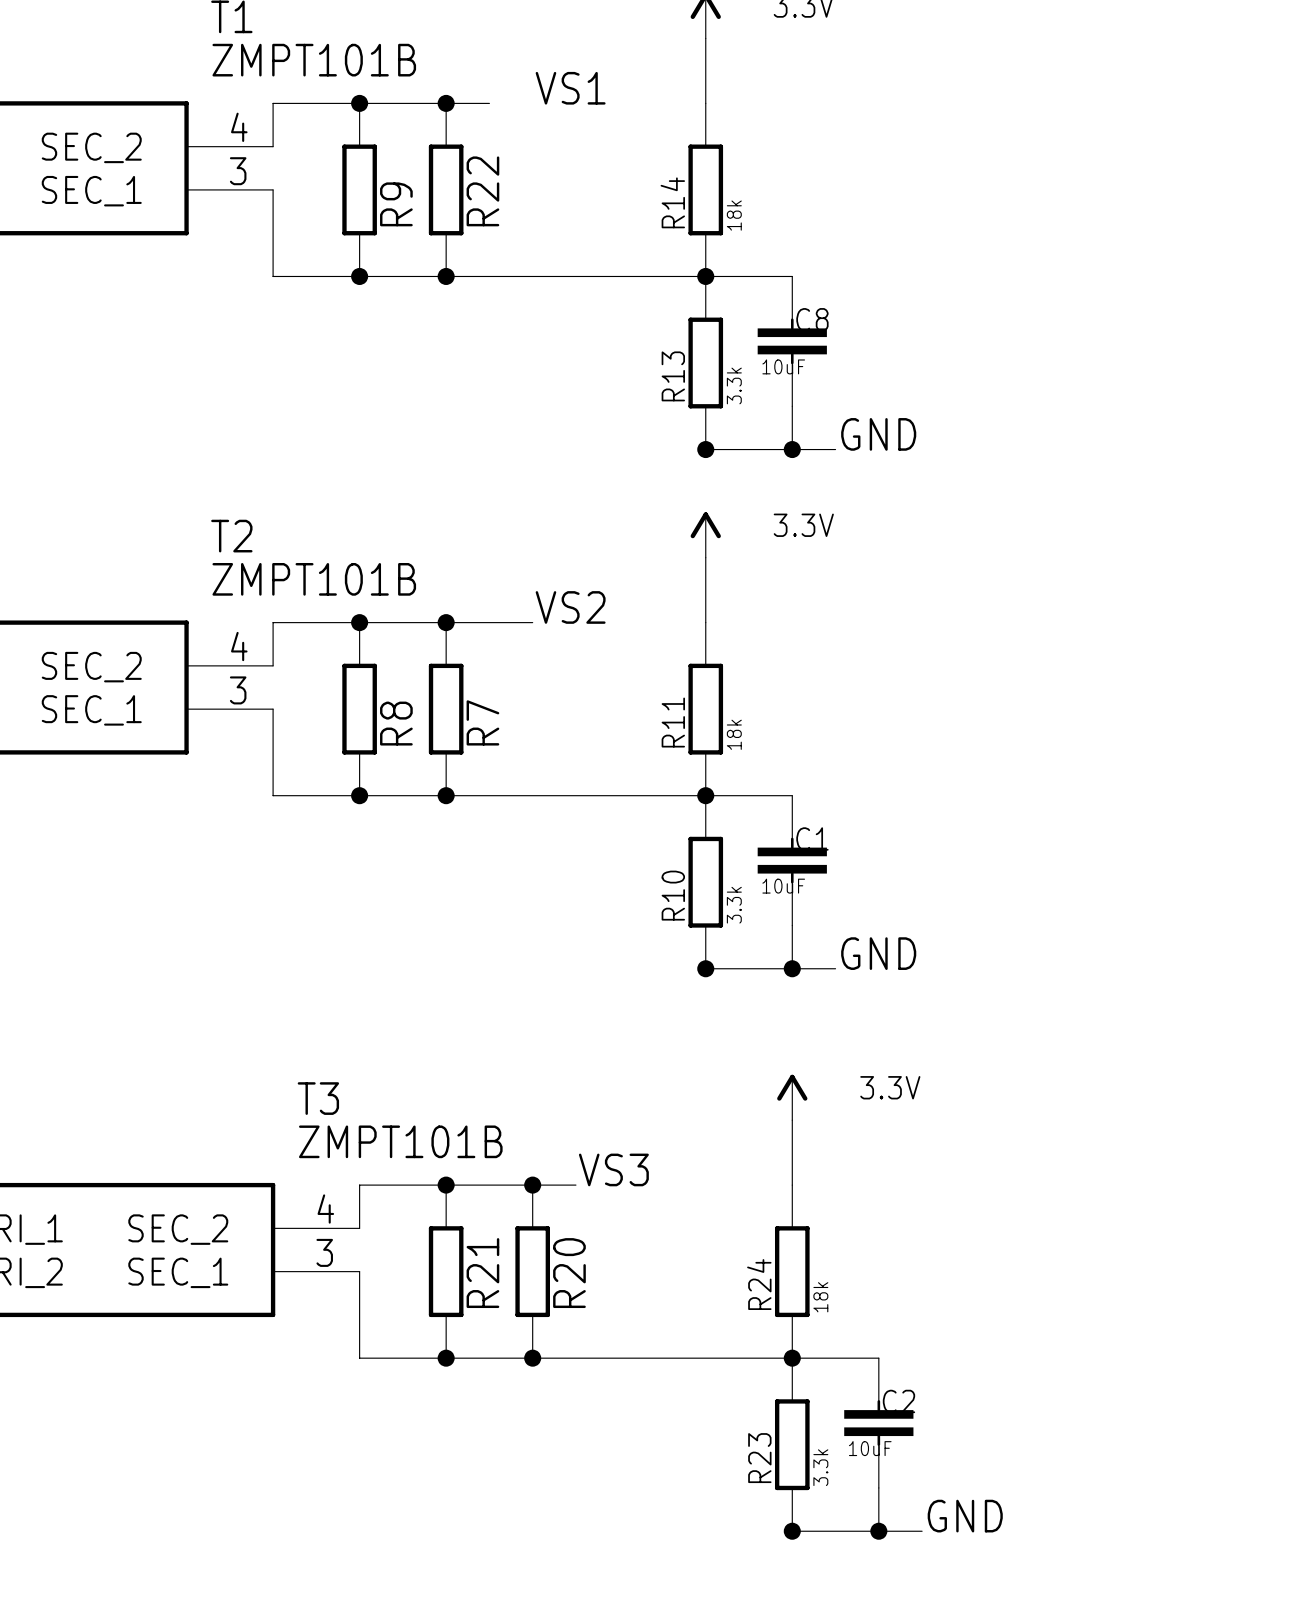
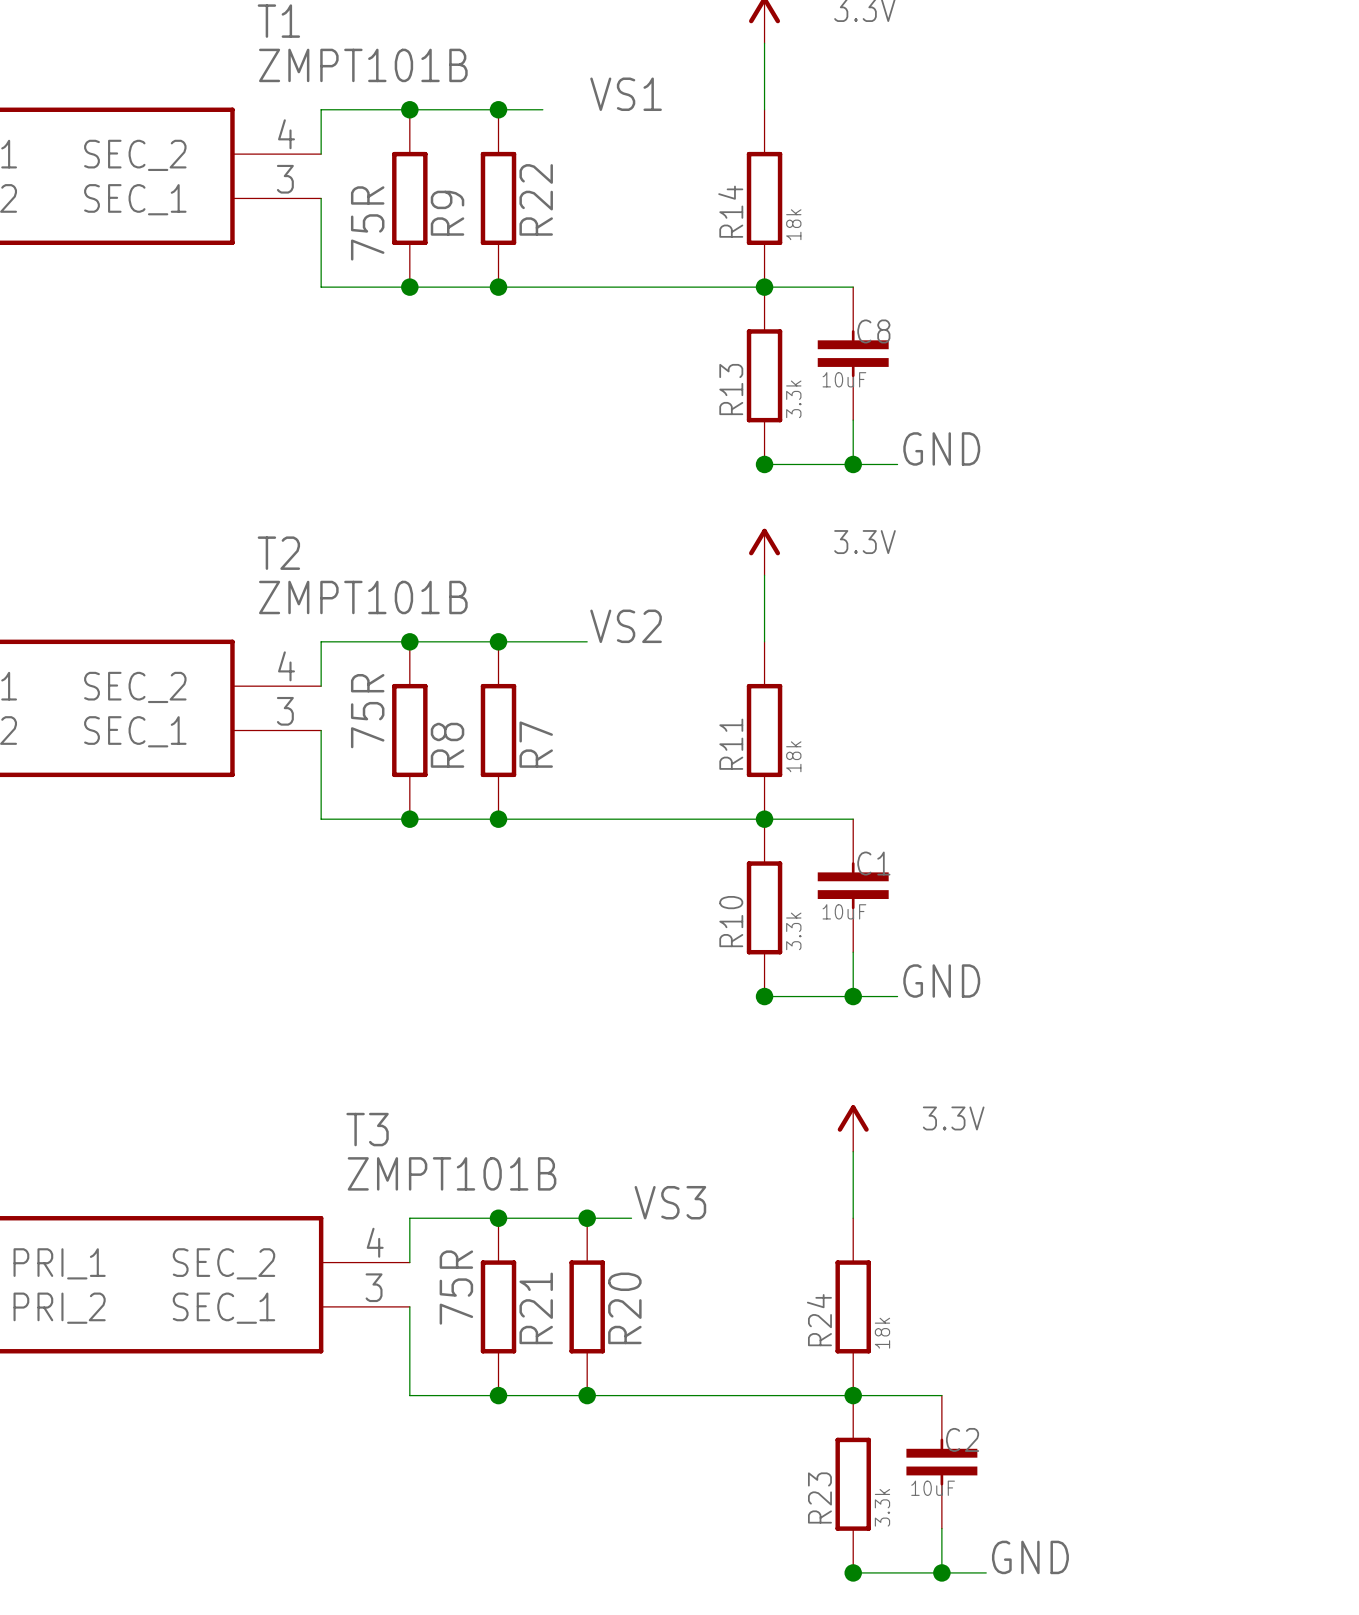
R9 value: none -> 75R (367, 223)
R8 value: none -> 75R (367, 711)
R21 value: none -> 75R (456, 1287)

